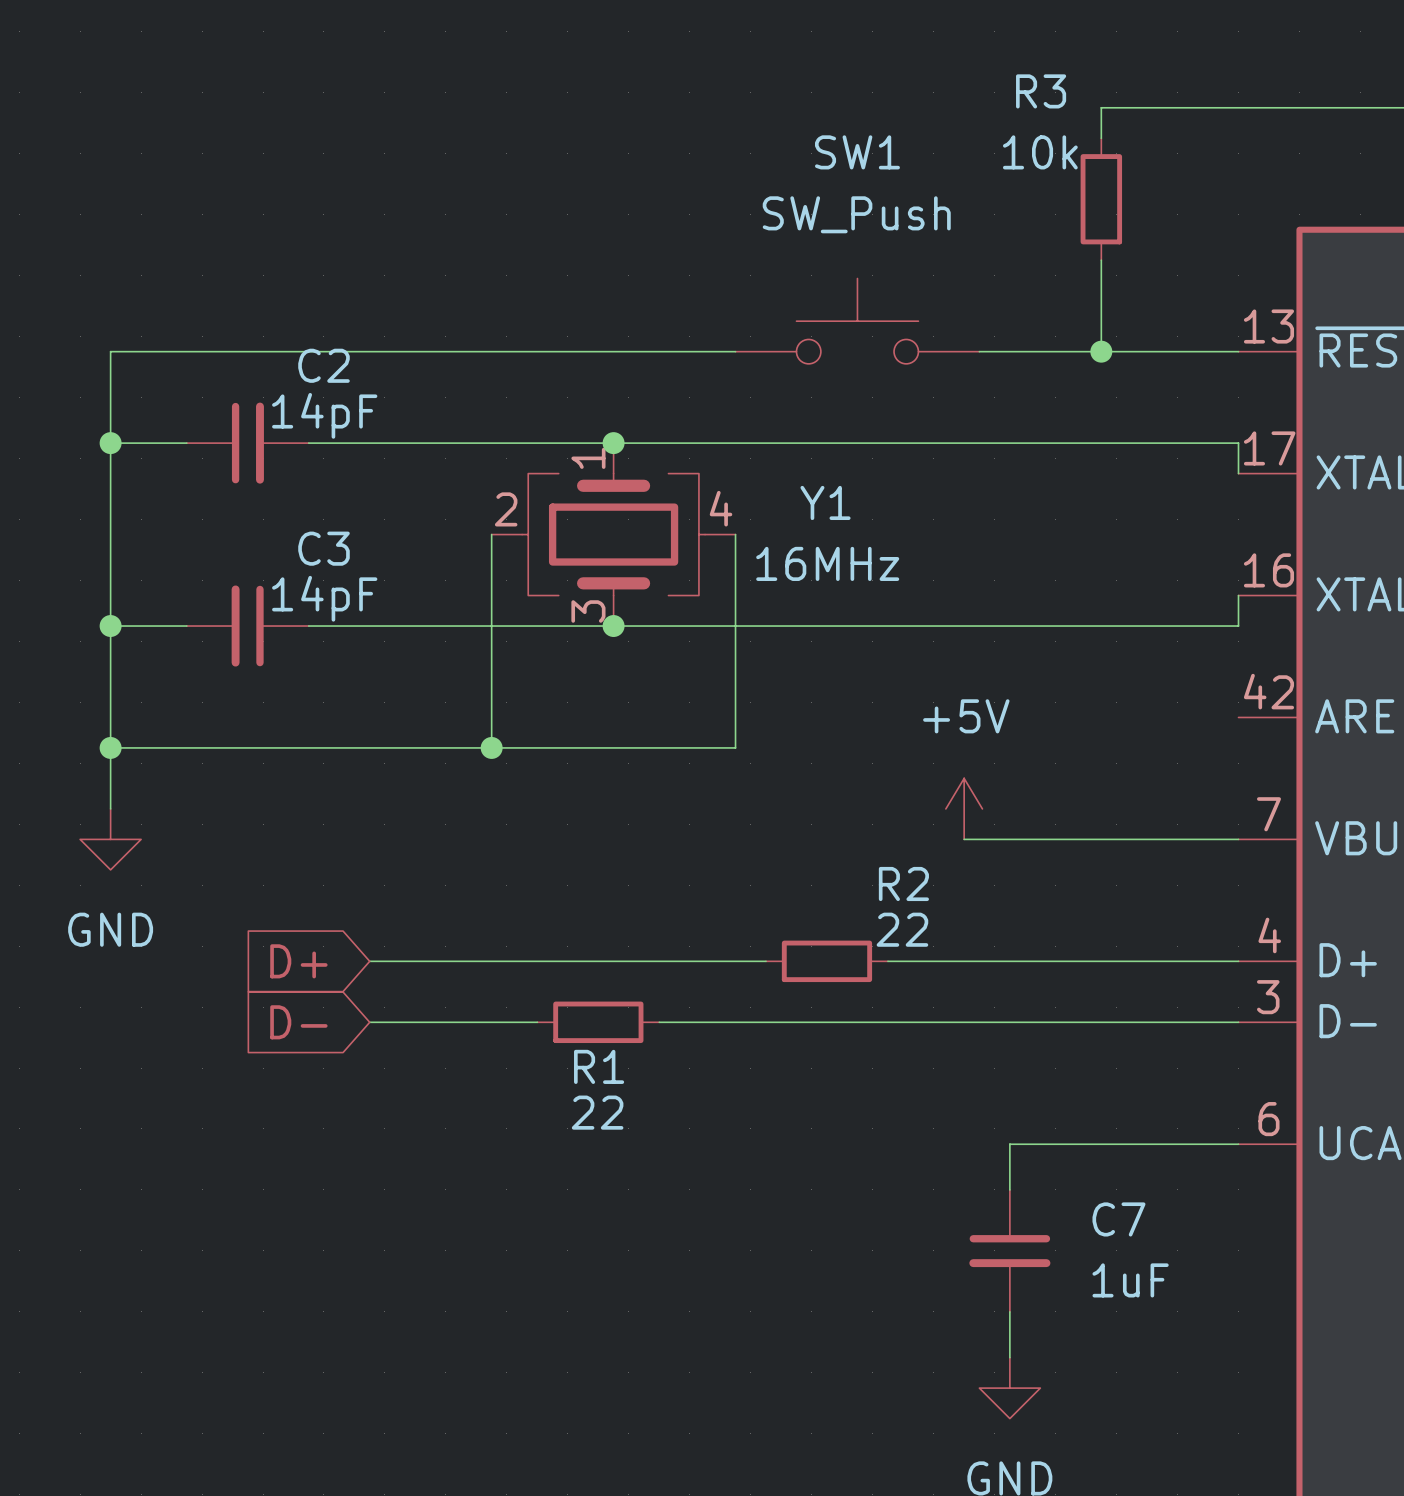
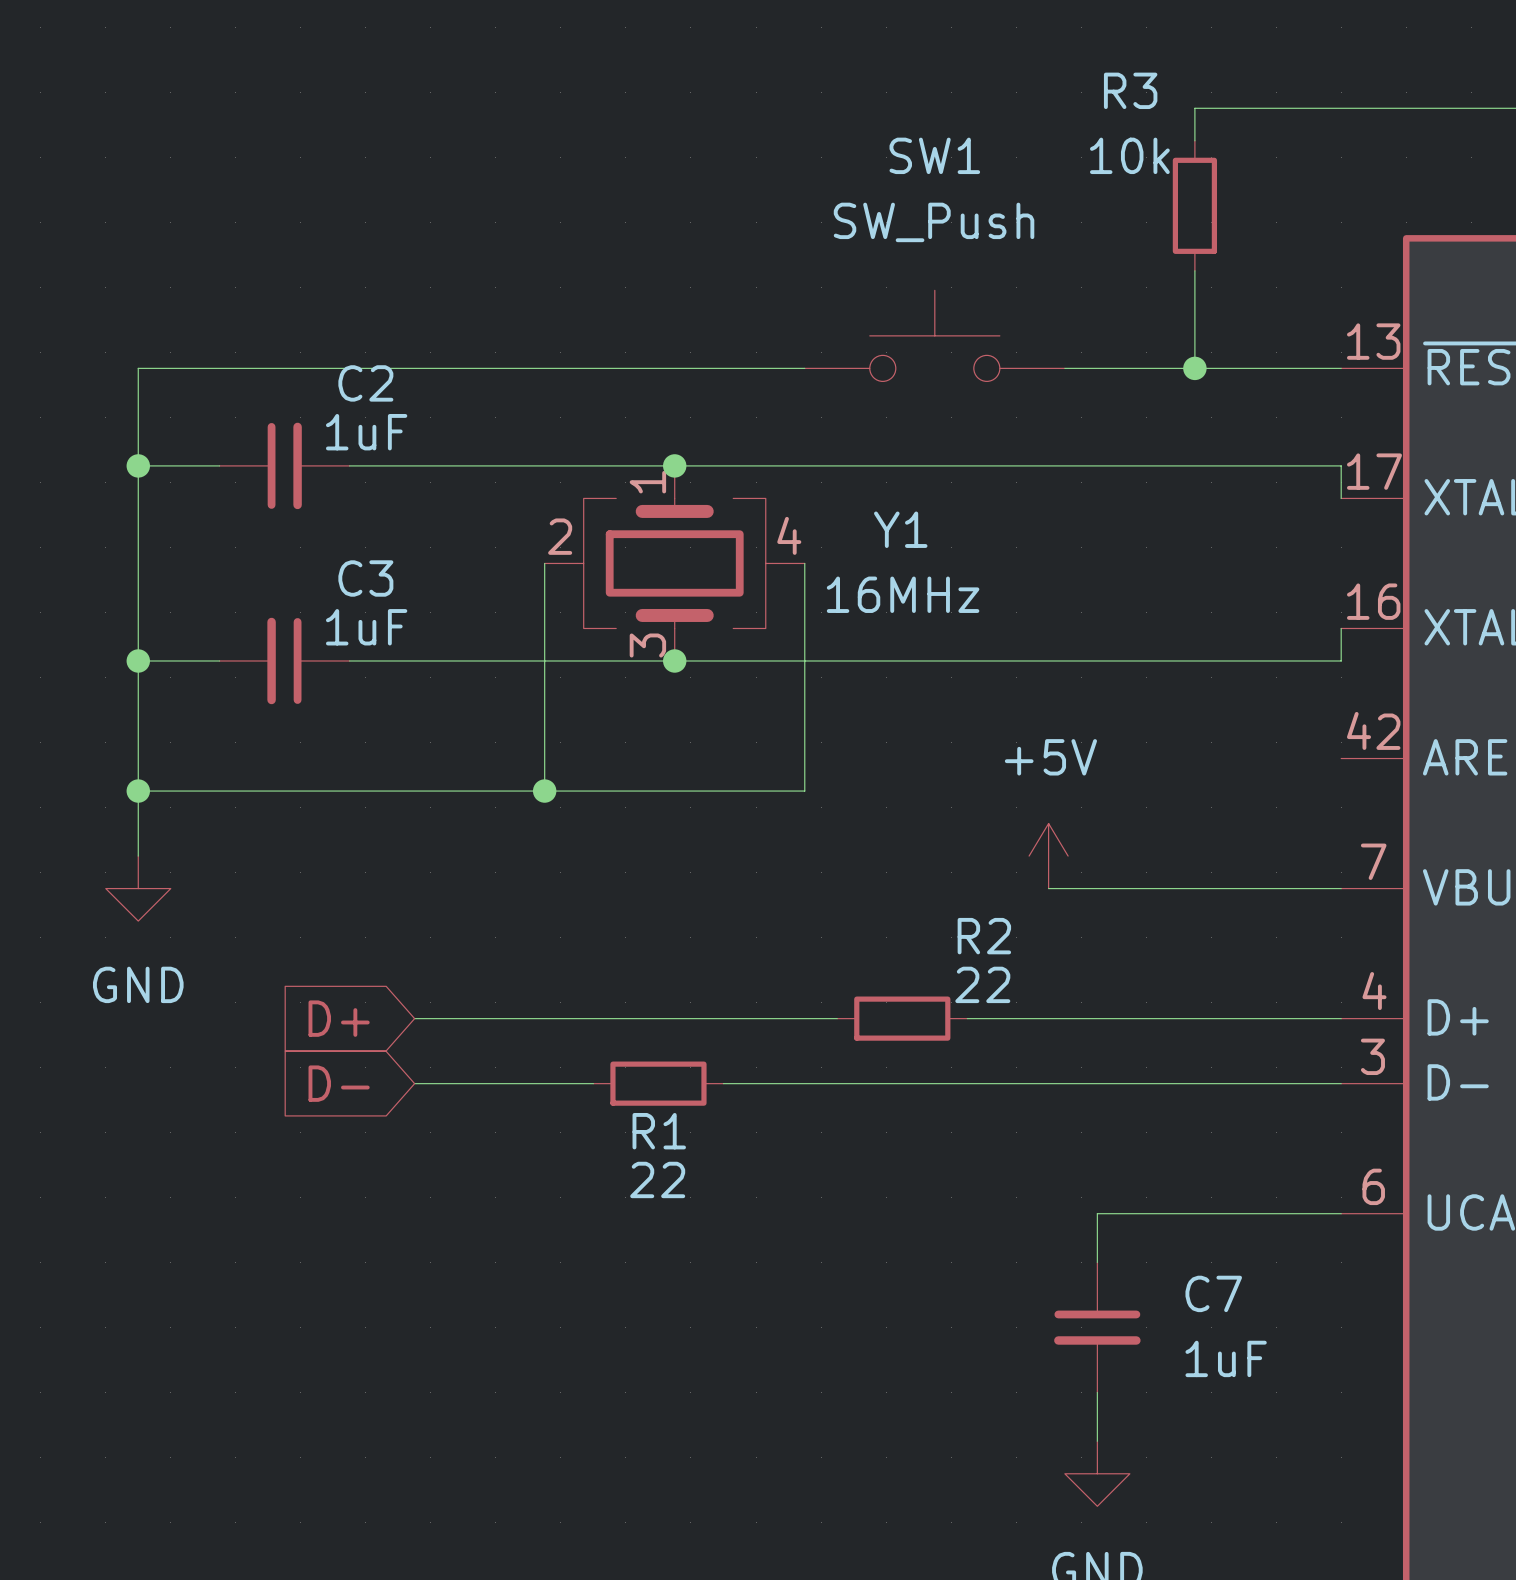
C2 value: 14pF (324, 415) -> 1uF (366, 432)
C3 value: 14pF (324, 598) -> 1uF (366, 627)

